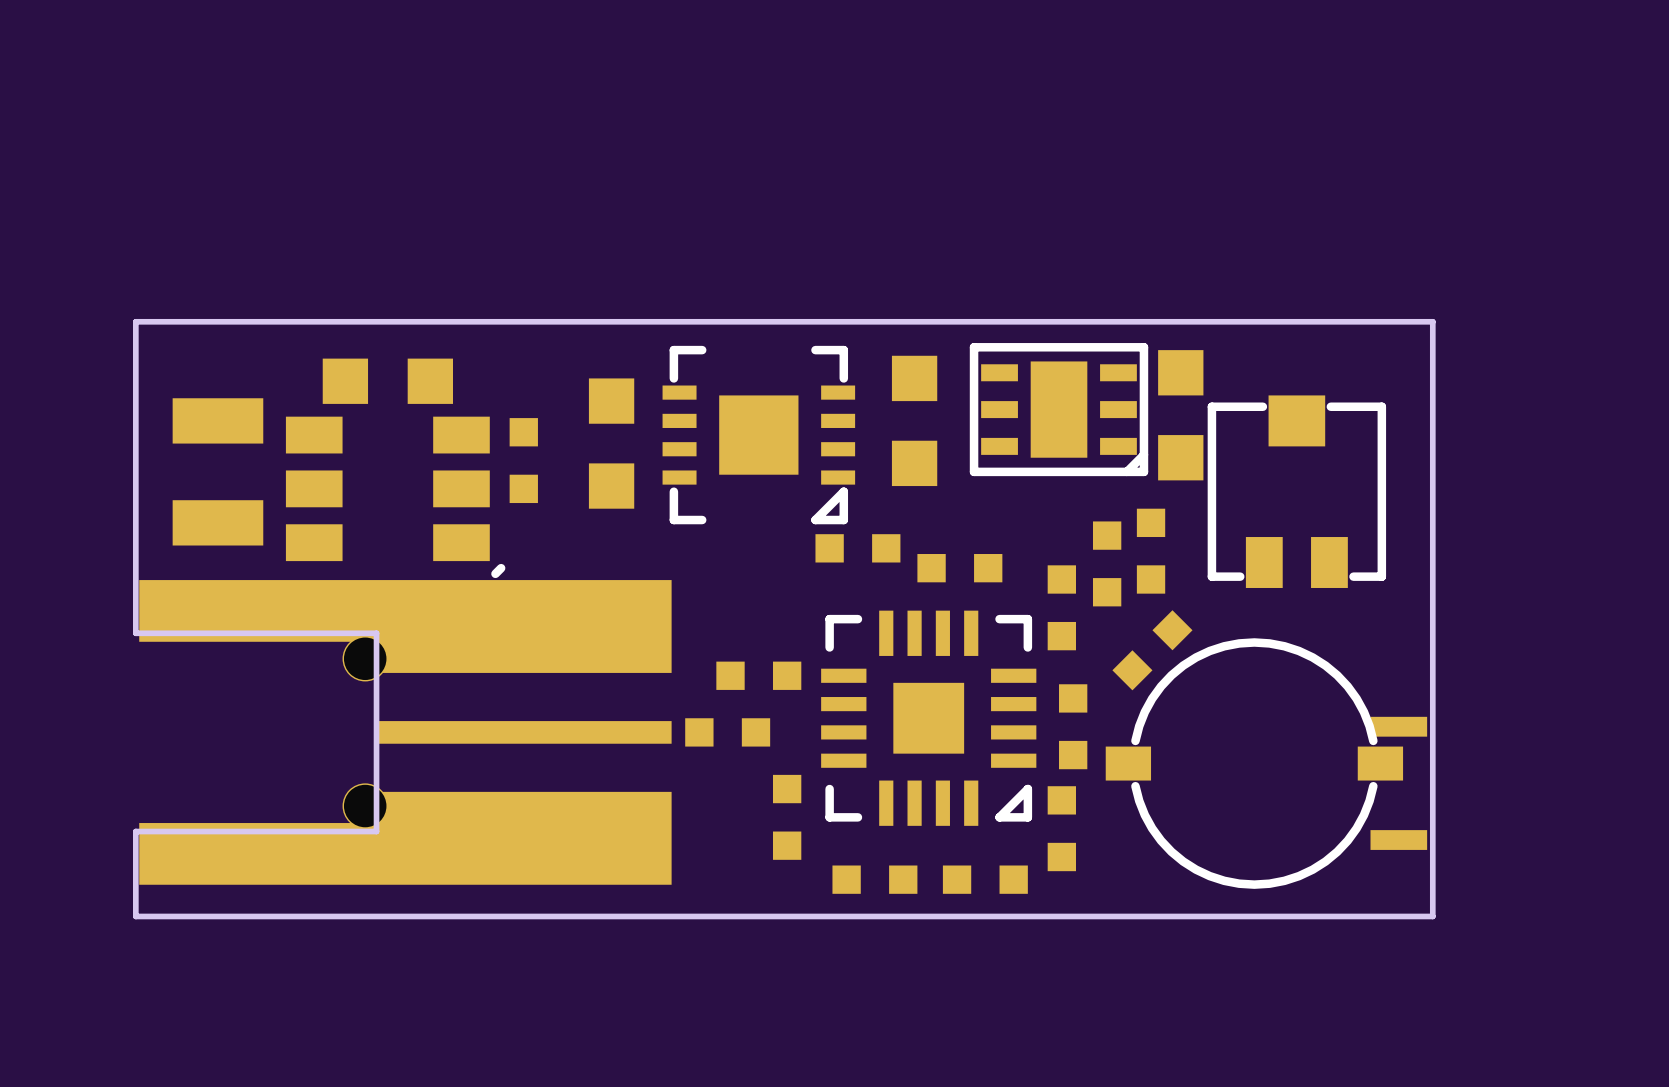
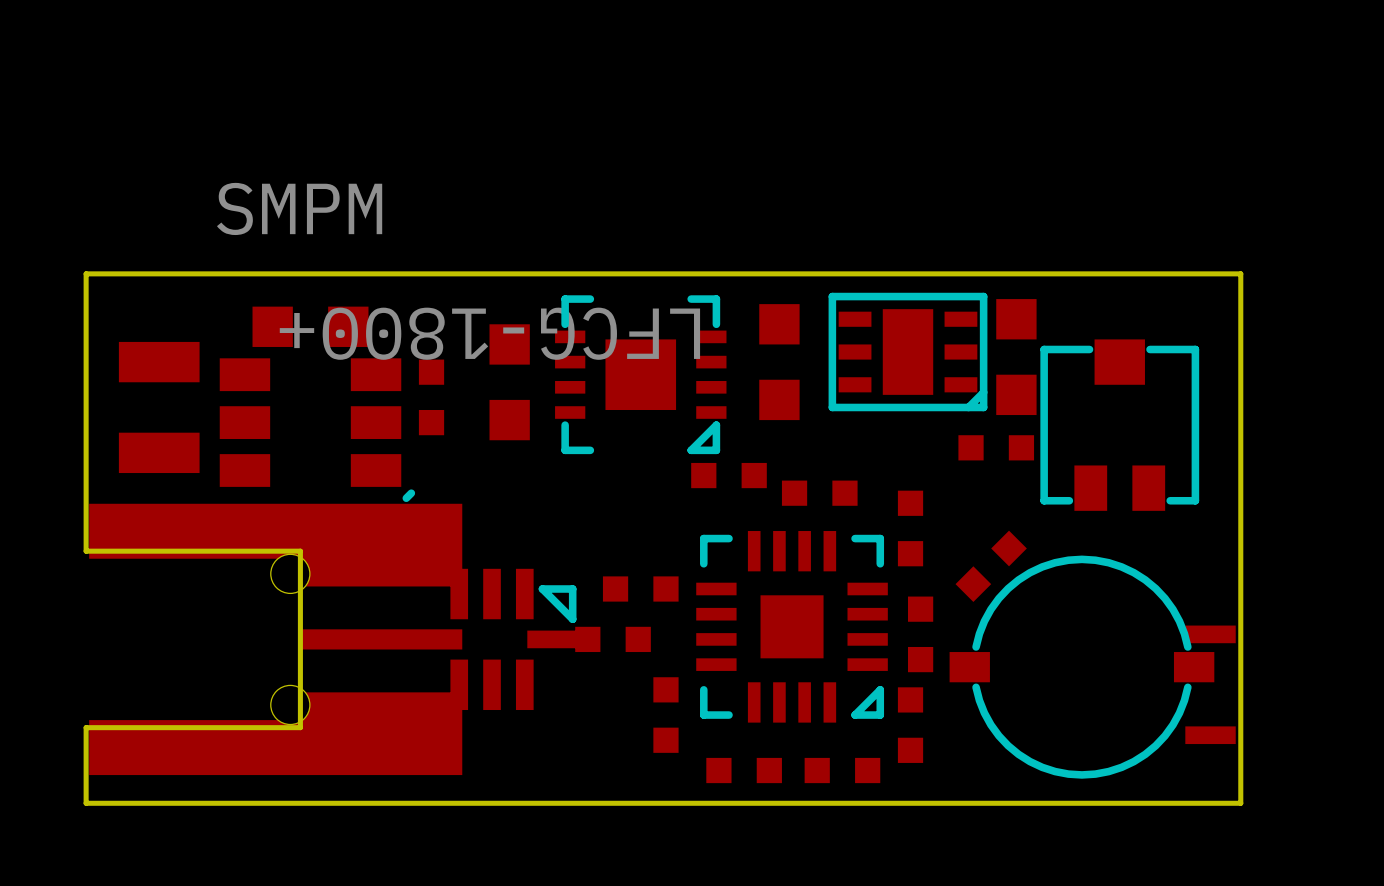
part value: none -> SMPM (299, 208)
part: none -> (996, 447)
part: (1151, 551) -> none
part: (1107, 563) -> none
part footprint: [139, 580, 672, 885] -> [89, 503, 463, 776]
part: none -> LFCG-1800+ (492, 639)

